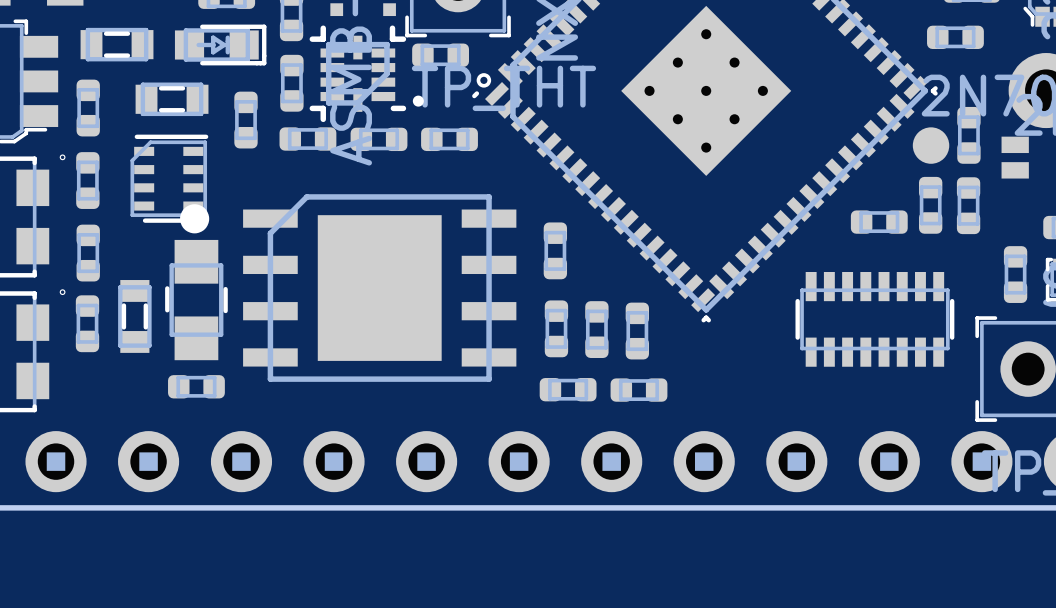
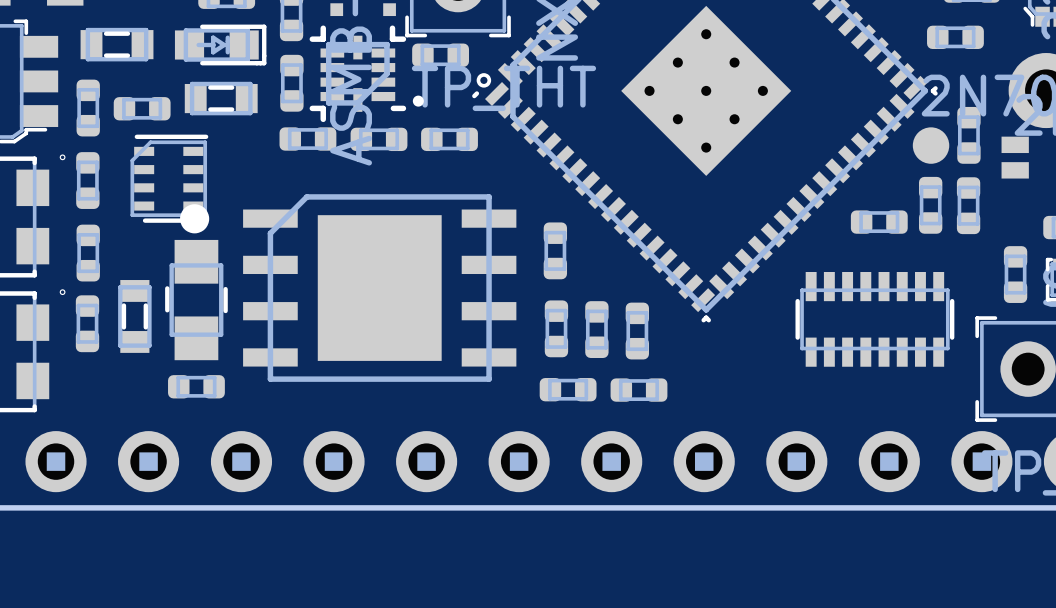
part position: (172, 99) -> (221, 98)
part rotation: 0° (246, 120) -> 90° clockwise (142, 108)
part position: (246, 120) -> (142, 108)

